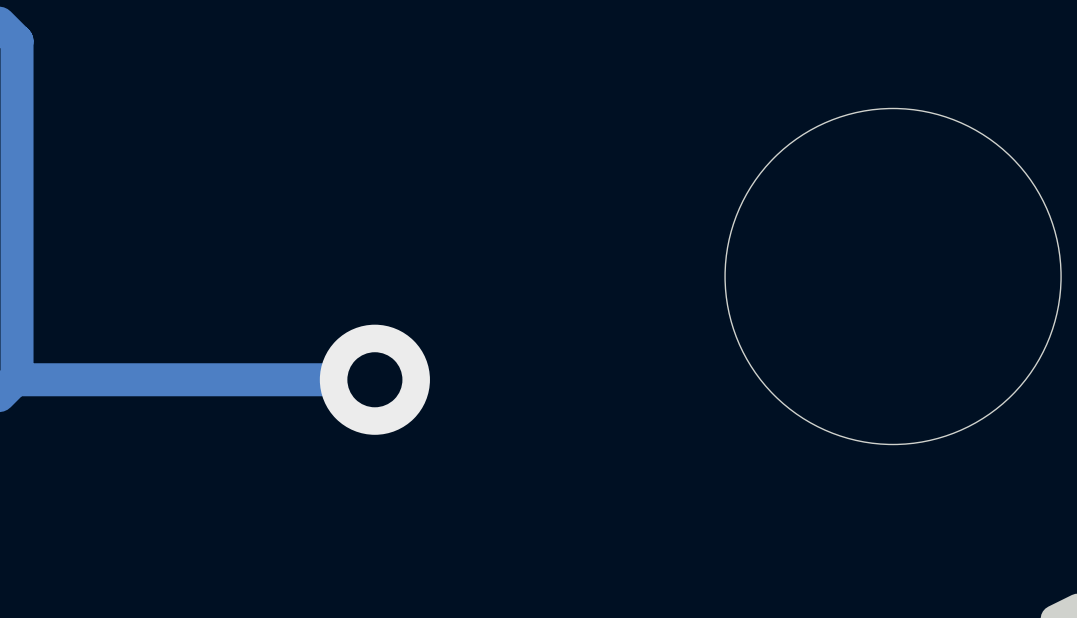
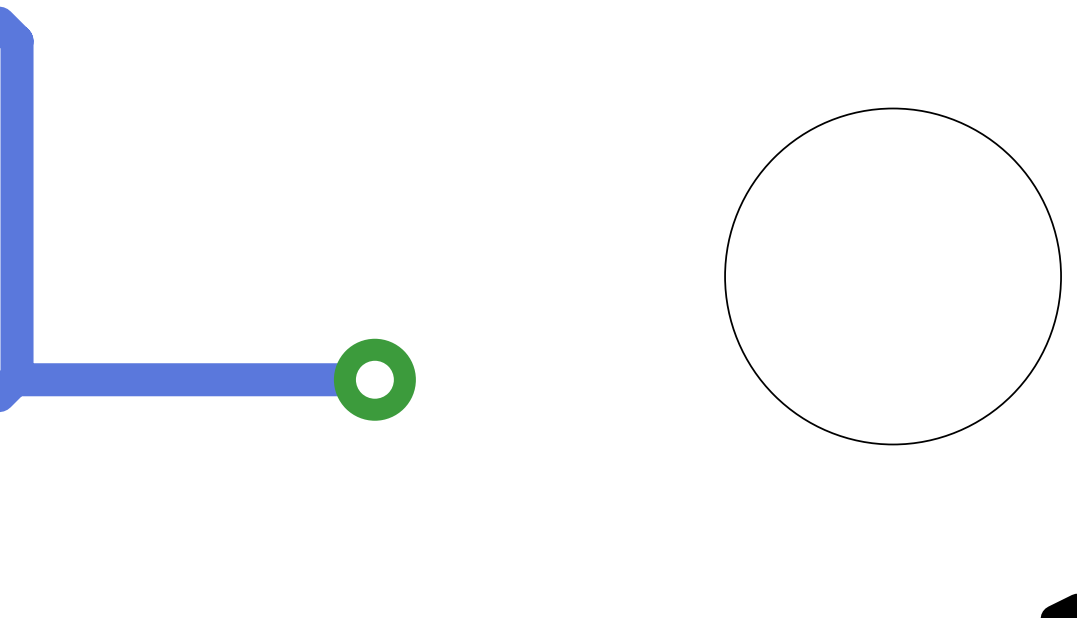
via size: [319, 324, 430, 435] -> [333, 338, 416, 421]

